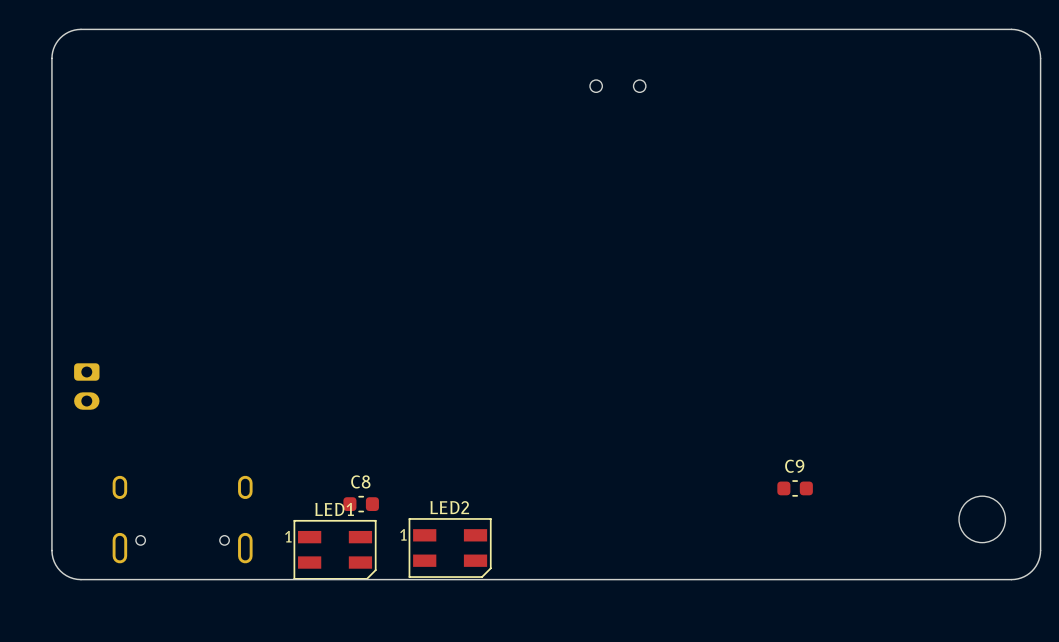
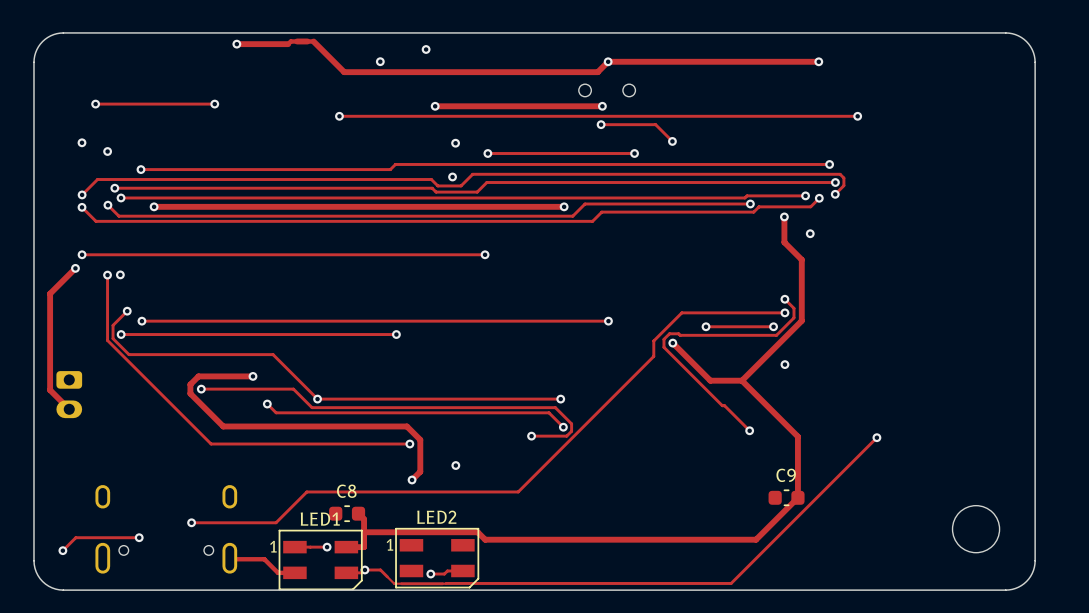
track: none -> (236, 44) (288, 44) (290, 41) (313, 41) (344, 72) (597, 72) (608, 61) (818, 61)
via: none -> (236, 44)
via: none -> (426, 49)
via: none -> (380, 61)
via: none -> (608, 61)
via: none -> (818, 61)
track: none -> (95, 104) (214, 104)
via: none -> (95, 104)
via: none -> (214, 104)
track: none -> (435, 106) (602, 106)
via: none -> (435, 106)
via: none -> (602, 106)
track: none -> (339, 116) (857, 116)
via: none -> (339, 116)
via: none -> (857, 116)
track: none -> (601, 124) (655, 124) (672, 141)
via: none -> (601, 124)
via: none -> (672, 141)
via: none -> (81, 142)
via: none -> (455, 143)
via: none -> (107, 151)
track: none -> (487, 153) (634, 153)
via: none -> (487, 153)
via: none -> (634, 153)
track: none -> (829, 164) (395, 164) (390, 169) (140, 169)
via: none -> (829, 164)
via: none -> (140, 169)
via: none -> (452, 176)
track: none -> (835, 182) (486, 182) (477, 192) (436, 192) (432, 188) (114, 188)
via: none -> (835, 182)
via: none -> (114, 188)
track: none -> (835, 194) (843, 185) (843, 178) (840, 174) (472, 174) (461, 185) (437, 185) (431, 179) (97, 179) (82, 194)
via: none -> (835, 194)
via: none -> (82, 194)
track: none -> (805, 195) (747, 195) (744, 197) (121, 197)
via: none -> (805, 195)
via: none -> (121, 197)
track: none -> (819, 198) (810, 206) (759, 206) (753, 212) (601, 212) (592, 221) (96, 221) (82, 207)
via: none -> (819, 198)
track: none -> (750, 203) (585, 203) (572, 216) (118, 216) (107, 205)
via: none -> (750, 203)
via: none -> (107, 205)
via: none -> (82, 207)
track: none -> (154, 206) (564, 206)
via: none -> (154, 206)
via: none -> (564, 206)
track: none -> (784, 216) (784, 242) (801, 259) (801, 320) (741, 380)
via: none -> (784, 216)
via: none -> (810, 233)
track: none -> (82, 254) (485, 254)
via: none -> (82, 254)
via: none -> (485, 254)
track: none -> (75, 268) (50, 293) (50, 390) (69, 409)
via: none -> (75, 268)
track: none -> (107, 275) (107, 340) (211, 444) (409, 444)
via: none -> (107, 275)
via: none -> (120, 274)
track: none -> (784, 299) (793, 308) (793, 317) (776, 335) (669, 333) (663, 339) (663, 347) (749, 430)
via: none -> (784, 299)
track: none -> (127, 311) (113, 325) (113, 338) (129, 354) (273, 354) (317, 399) (560, 399)
via: none -> (127, 311)
track: none -> (784, 312) (681, 312) (653, 340) (653, 356) (518, 491) (306, 491) (276, 522) (191, 522)
via: none -> (784, 312)
track: none -> (141, 321) (608, 321)
via: none -> (141, 321)
via: none -> (608, 321)
track: none -> (706, 326) (773, 326)
via: none -> (706, 326)
via: none -> (773, 326)
track: none -> (121, 334) (396, 334)
via: none -> (121, 334)
via: none -> (396, 334)
track: none -> (672, 343) (710, 380) (741, 380)
via: none -> (672, 343)
via: none -> (784, 364)
track: none -> (252, 376) (198, 376) (190, 384) (190, 393) (223, 426) (406, 426) (420, 439) (420, 471) (412, 479)
via: none -> (252, 376)
track: none -> (741, 380) (797, 436) (797, 497) (756, 539) (485, 539) (477, 532) (364, 532)
track: none -> (201, 389) (293, 389) (312, 407) (555, 407) (571, 423) (571, 431) (566, 436) (531, 436)
via: none -> (201, 389)
via: none -> (317, 399)
via: none -> (560, 399)
track: none -> (267, 404) (276, 412) (549, 412) (563, 427)
via: none -> (267, 404)
via: none -> (563, 427)
via: none -> (749, 430)
via: none -> (531, 436)
track: none -> (876, 437) (731, 583) (394, 583) (380, 569) (346, 572)
via: none -> (876, 437)
via: none -> (409, 444)
via: none -> (455, 465)
via: none -> (412, 479)
track: none -> (358, 513) (364, 519) (364, 547) (346, 547)
via: none -> (191, 522)
track: none -> (139, 537) (75, 537) (62, 550)
via: none -> (139, 537)
track: none -> (294, 547) (327, 547)
via: none -> (327, 547)
via: none -> (62, 550)
track: none -> (229, 558) (264, 559) (278, 572) (294, 572)
via: none -> (364, 569)
track: none -> (462, 570) (430, 574)
via: none -> (430, 574)

